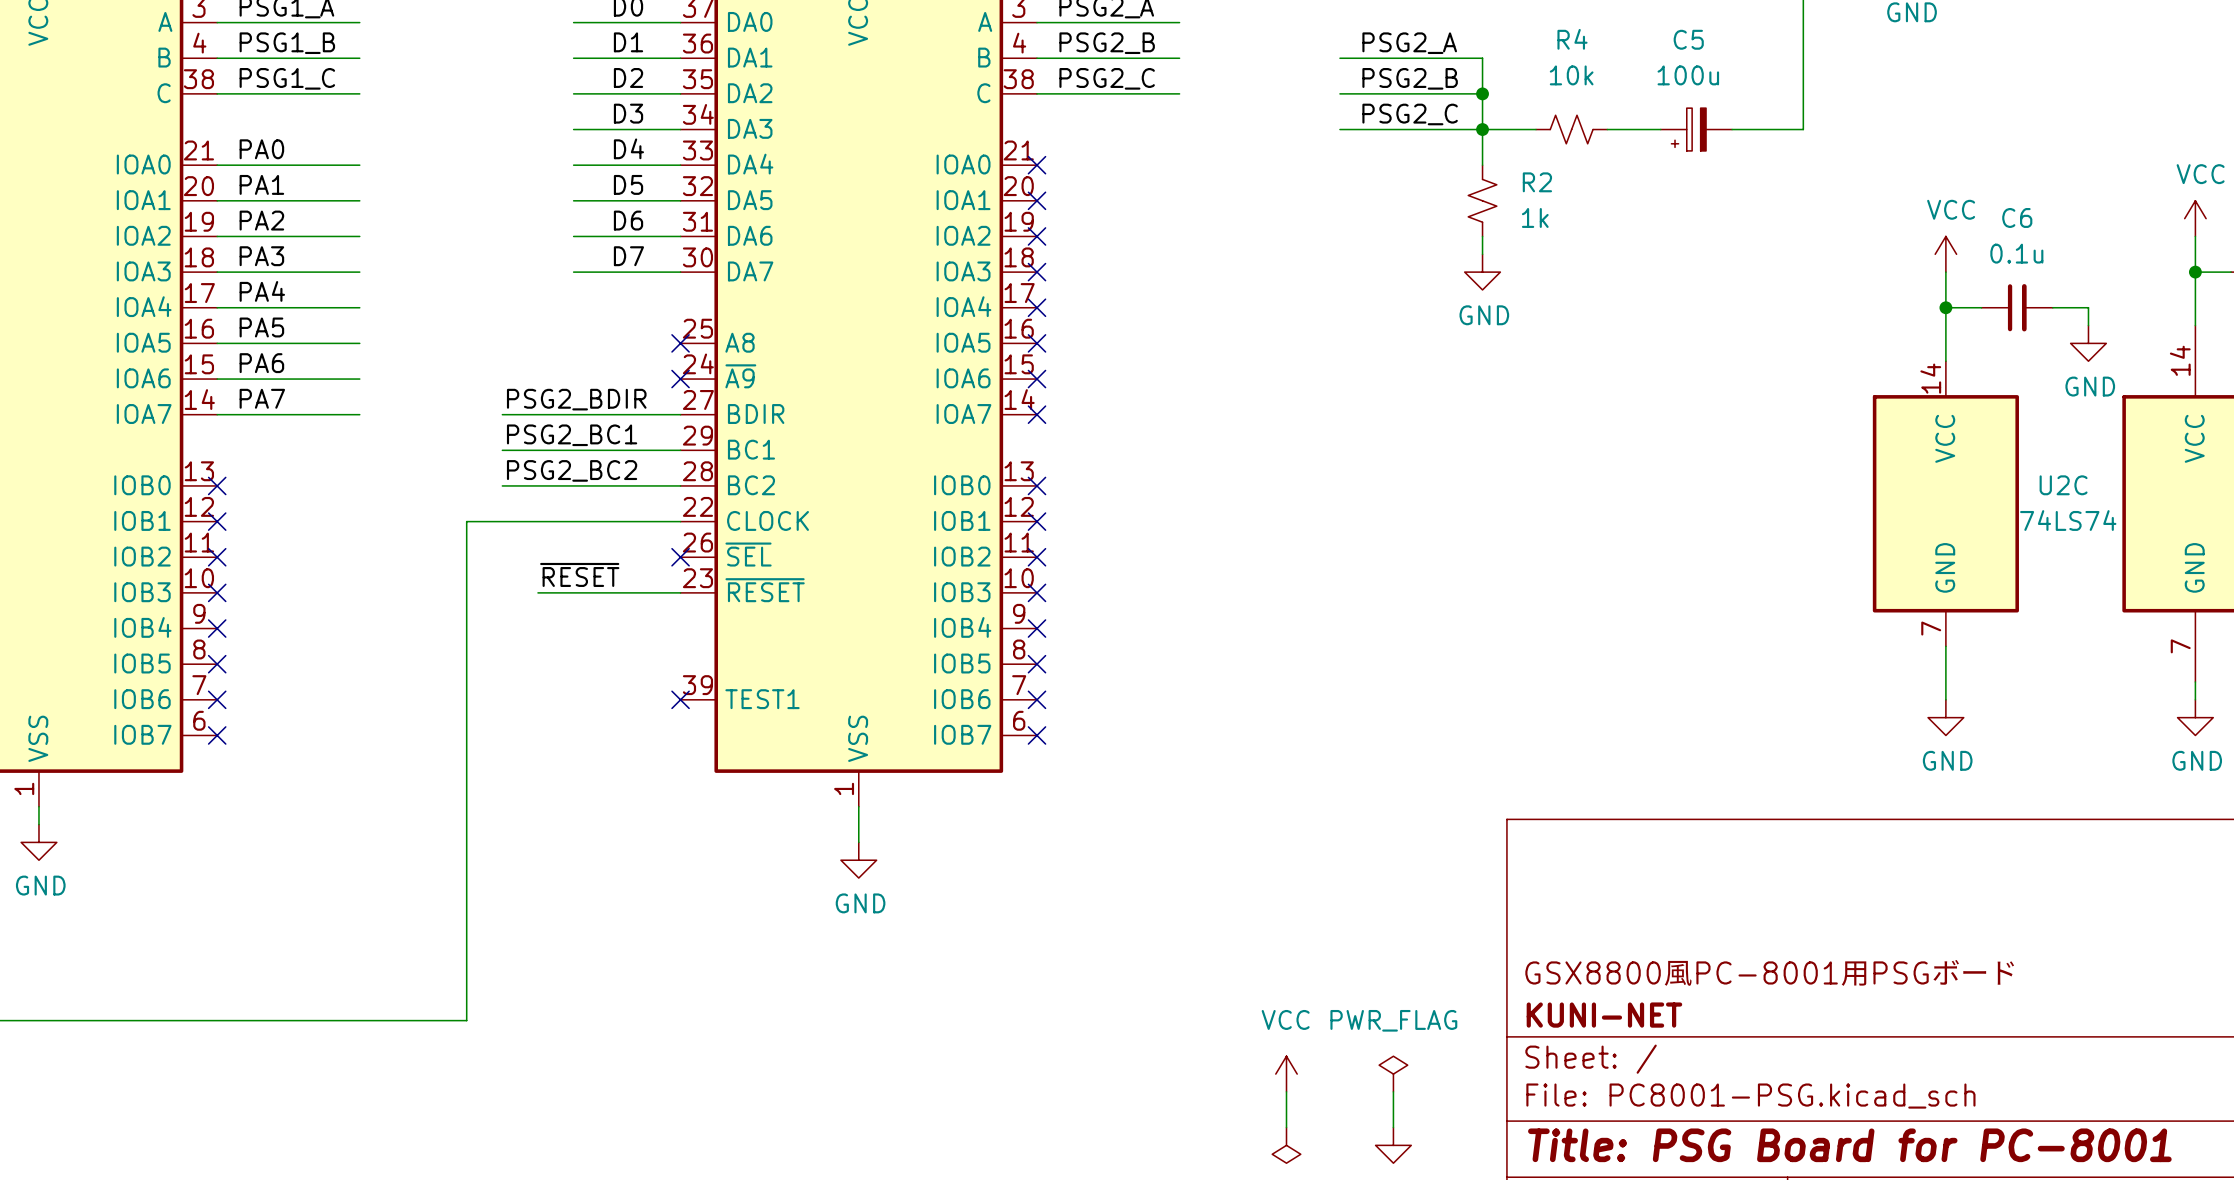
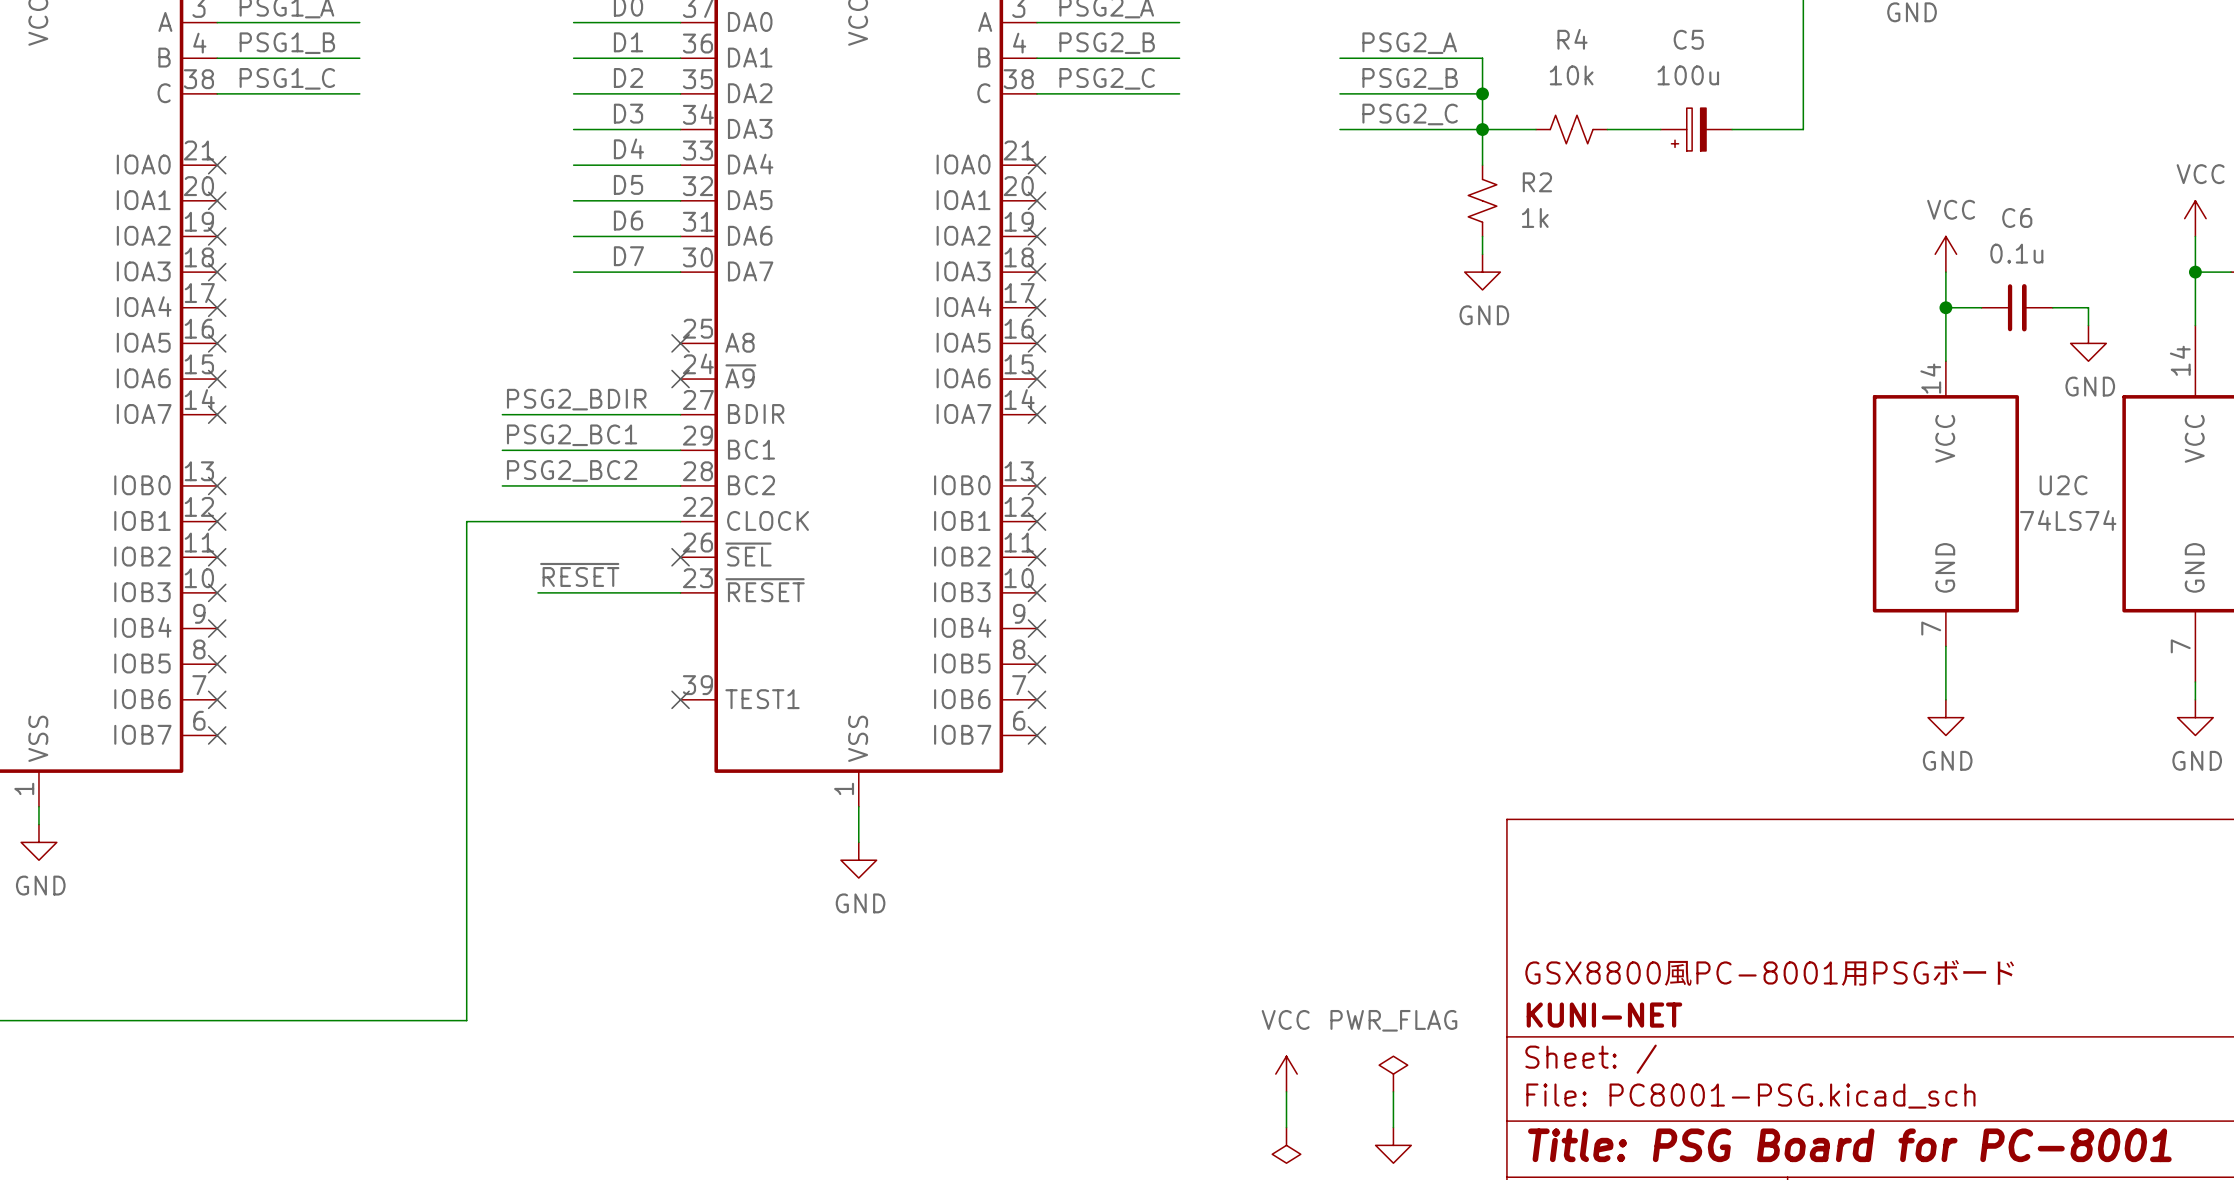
label: PA0 (261, 149) -> none
wire: (217, 165) (359, 165) -> none
no-connect mark: none -> (217, 165)
label: PA1 (261, 184) -> none
wire: (217, 200) (359, 200) -> none
no-connect mark: none -> (217, 200)
label: PA2 (261, 220) -> none
wire: (217, 236) (359, 236) -> none
no-connect mark: none -> (217, 236)
label: PA3 (261, 256) -> none
wire: (217, 272) (359, 272) -> none
no-connect mark: none -> (217, 272)
label: PA4 (262, 291) -> none
wire: (217, 307) (359, 307) -> none
no-connect mark: none -> (217, 307)
label: PA5 (261, 327) -> none
wire: (217, 343) (359, 343) -> none
no-connect mark: none -> (217, 343)
label: PA6 (261, 363) -> none
wire: (217, 379) (359, 379) -> none
no-connect mark: none -> (217, 379)
label: PA7 (262, 398) -> none
wire: (217, 414) (359, 414) -> none
no-connect mark: none -> (217, 414)

